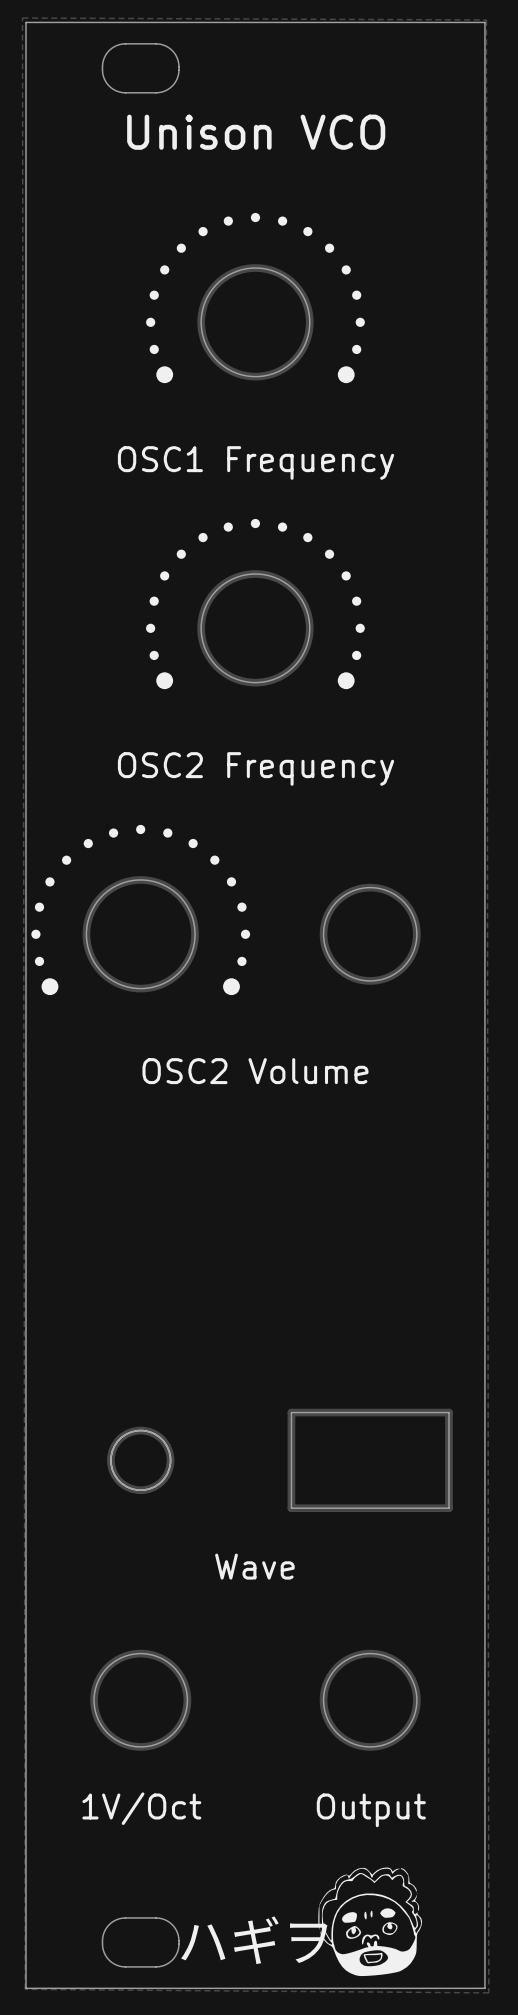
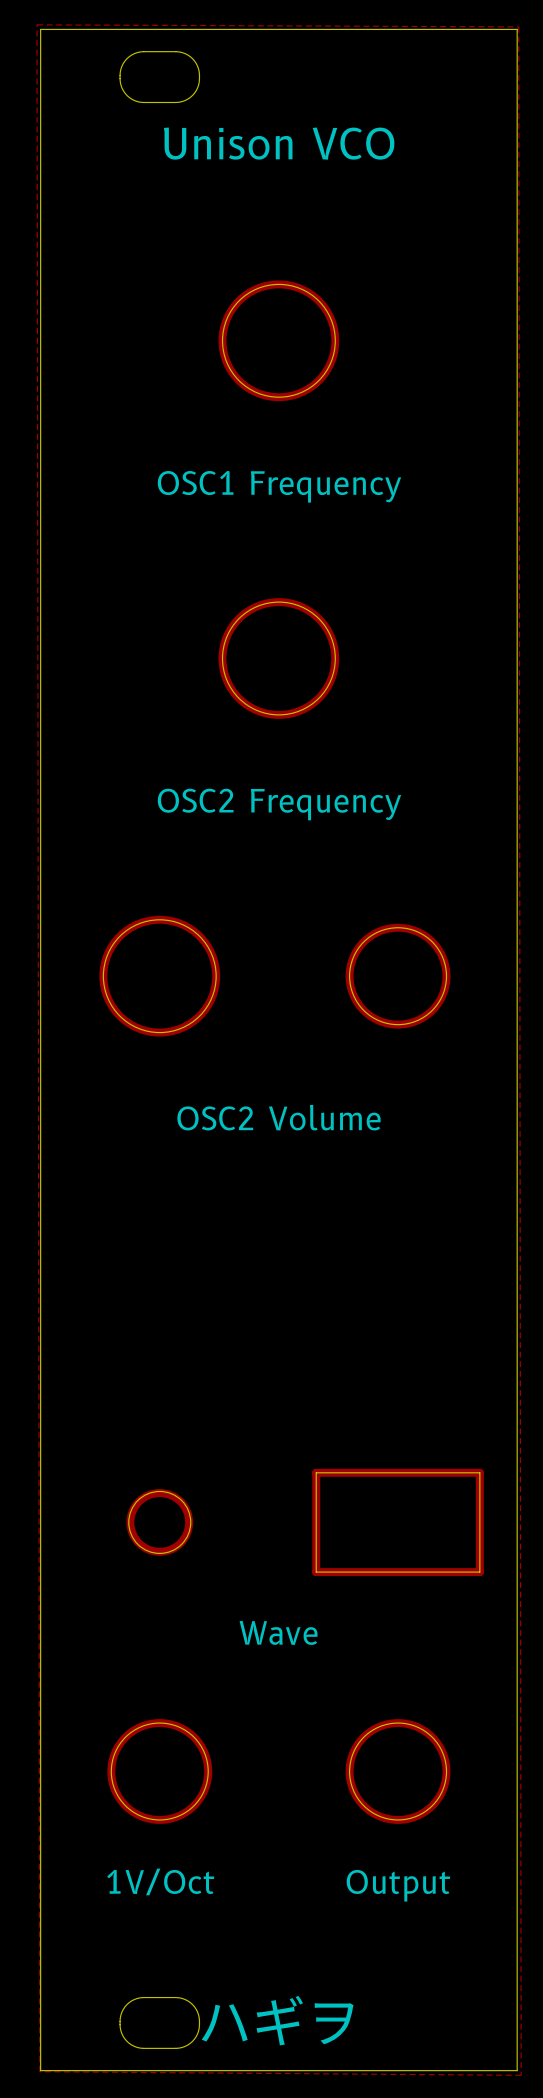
drawing: [146, 212, 365, 384] -> none
drawing: [146, 518, 365, 690] -> none
drawing: [31, 824, 251, 996] -> none
drawing: [107, 1426, 175, 1495] -> none
drawing: none -> [126, 1489, 194, 1556]
drawing: [318, 1867, 423, 1977] -> none

